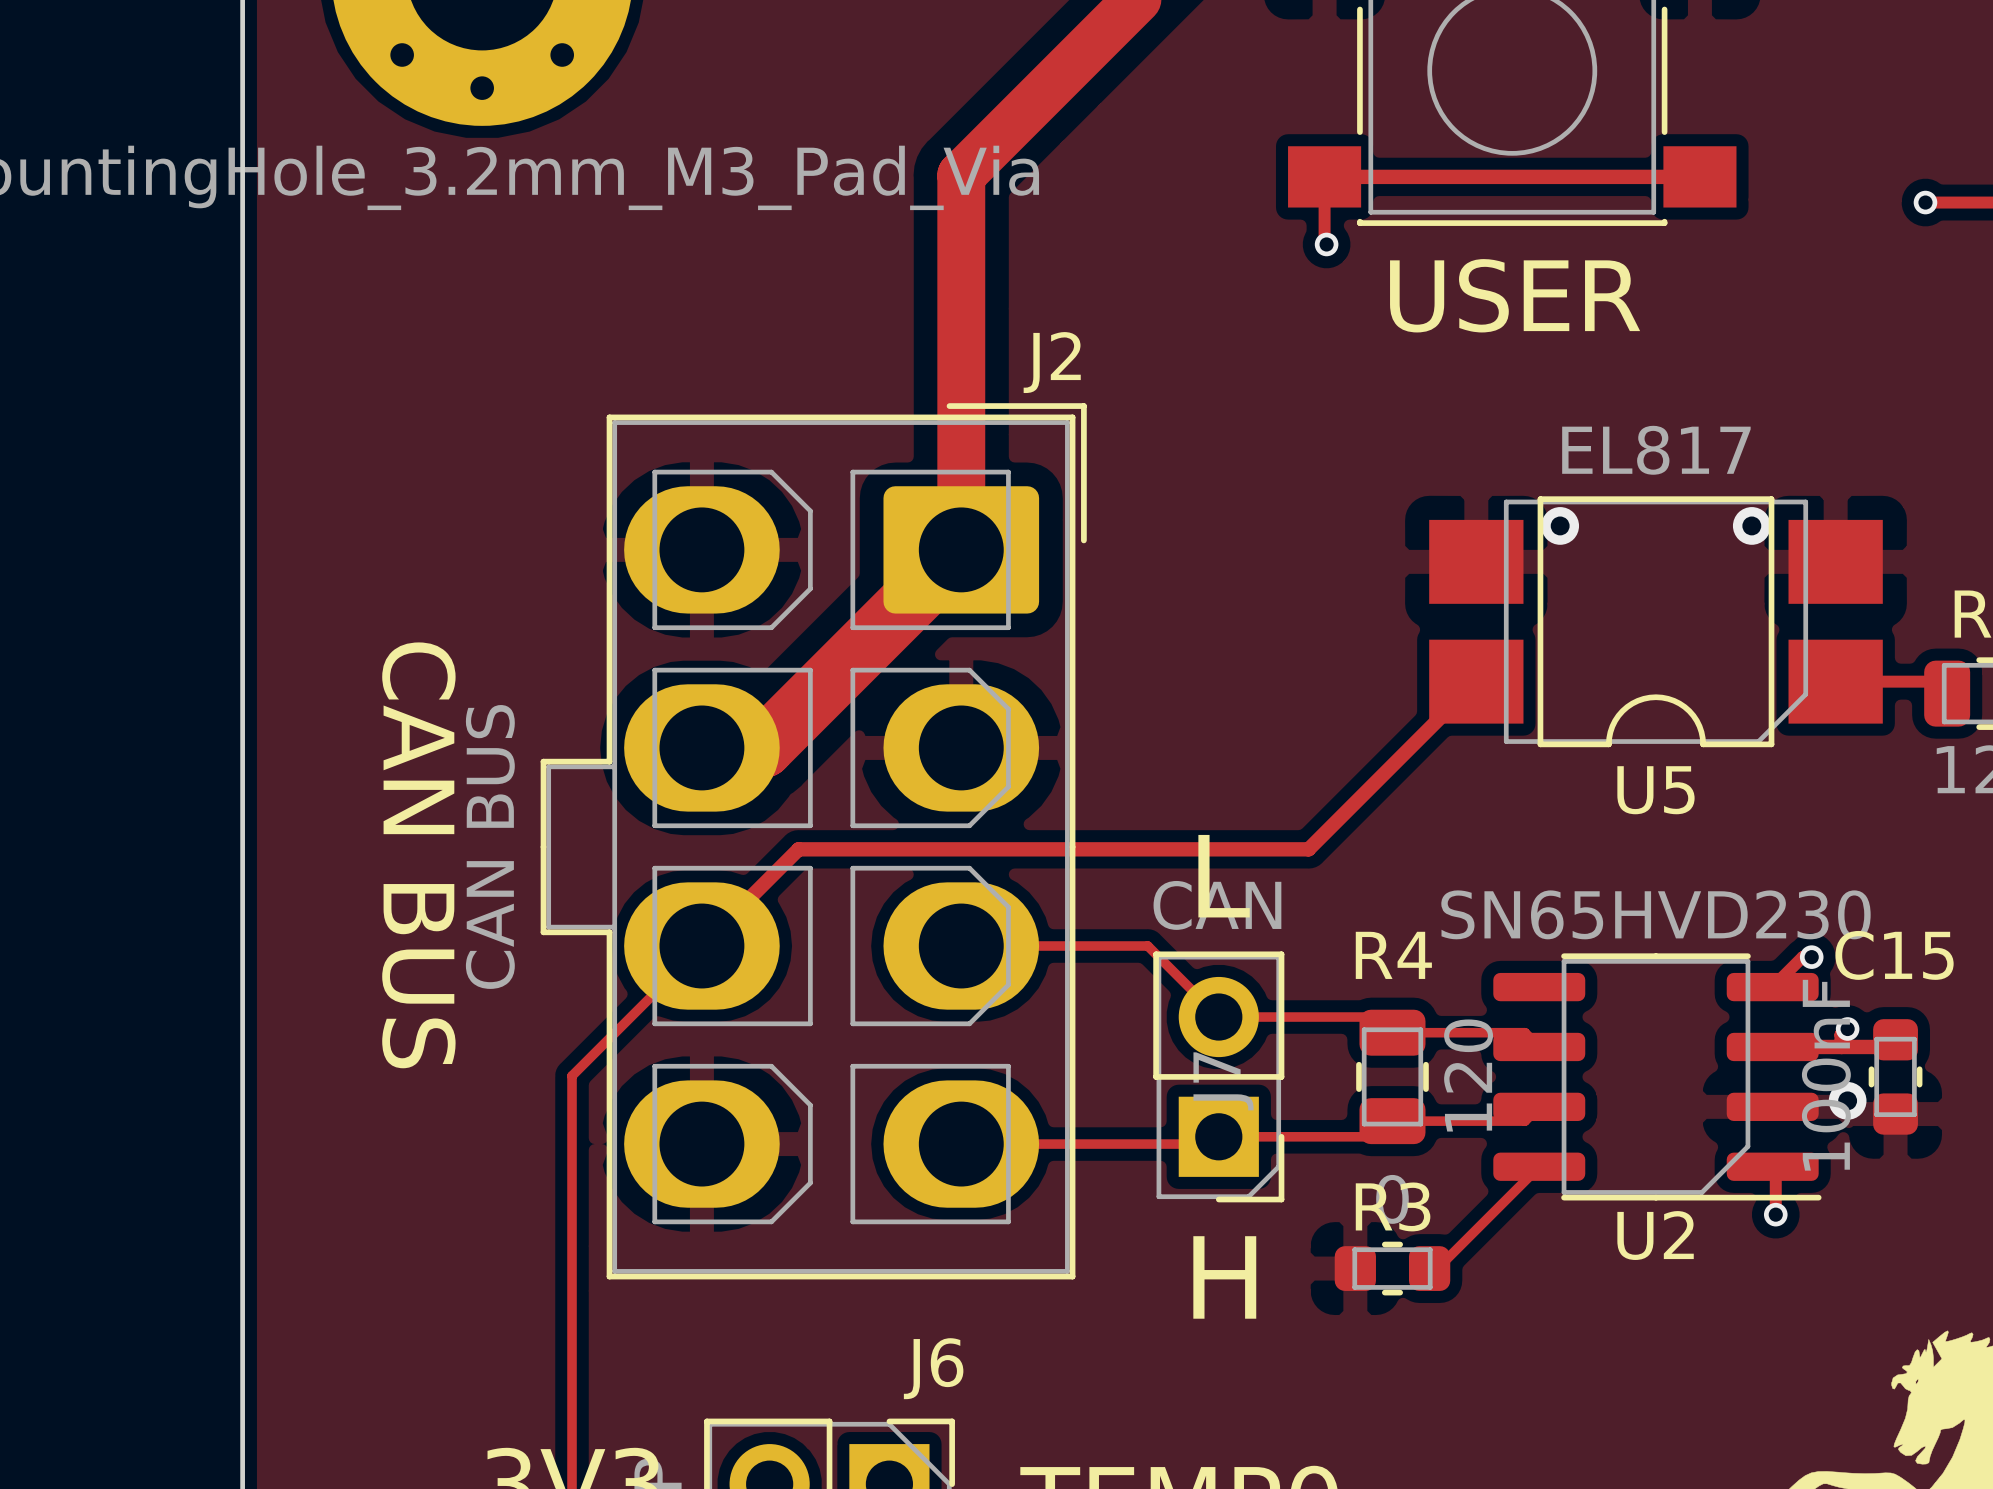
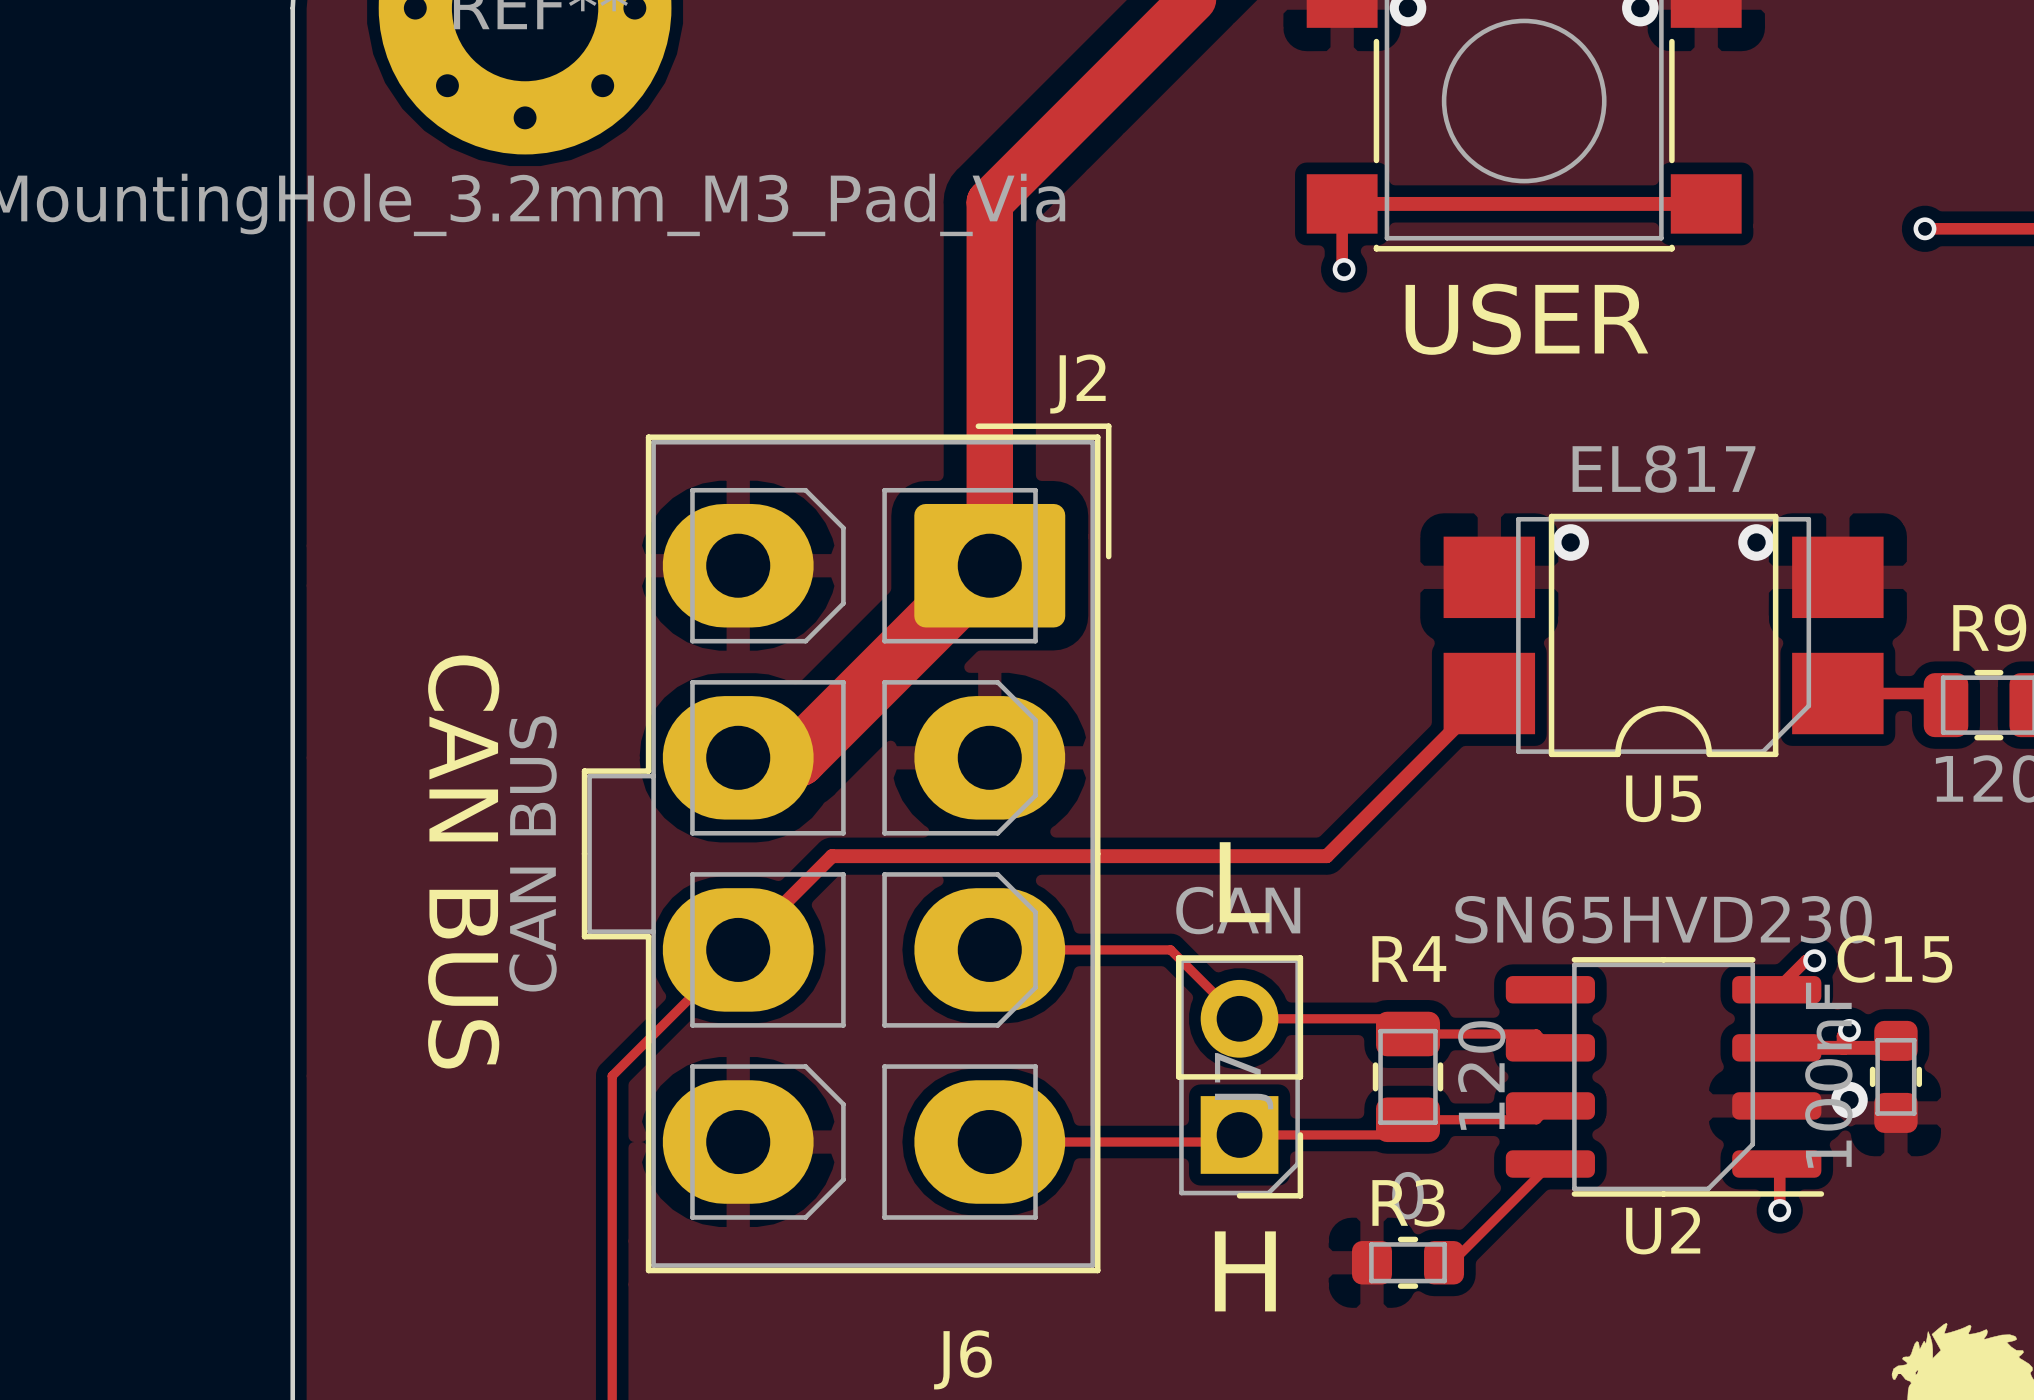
J2 footprint: [540, 403, 1087, 1280] -> [581, 423, 1112, 1274]

